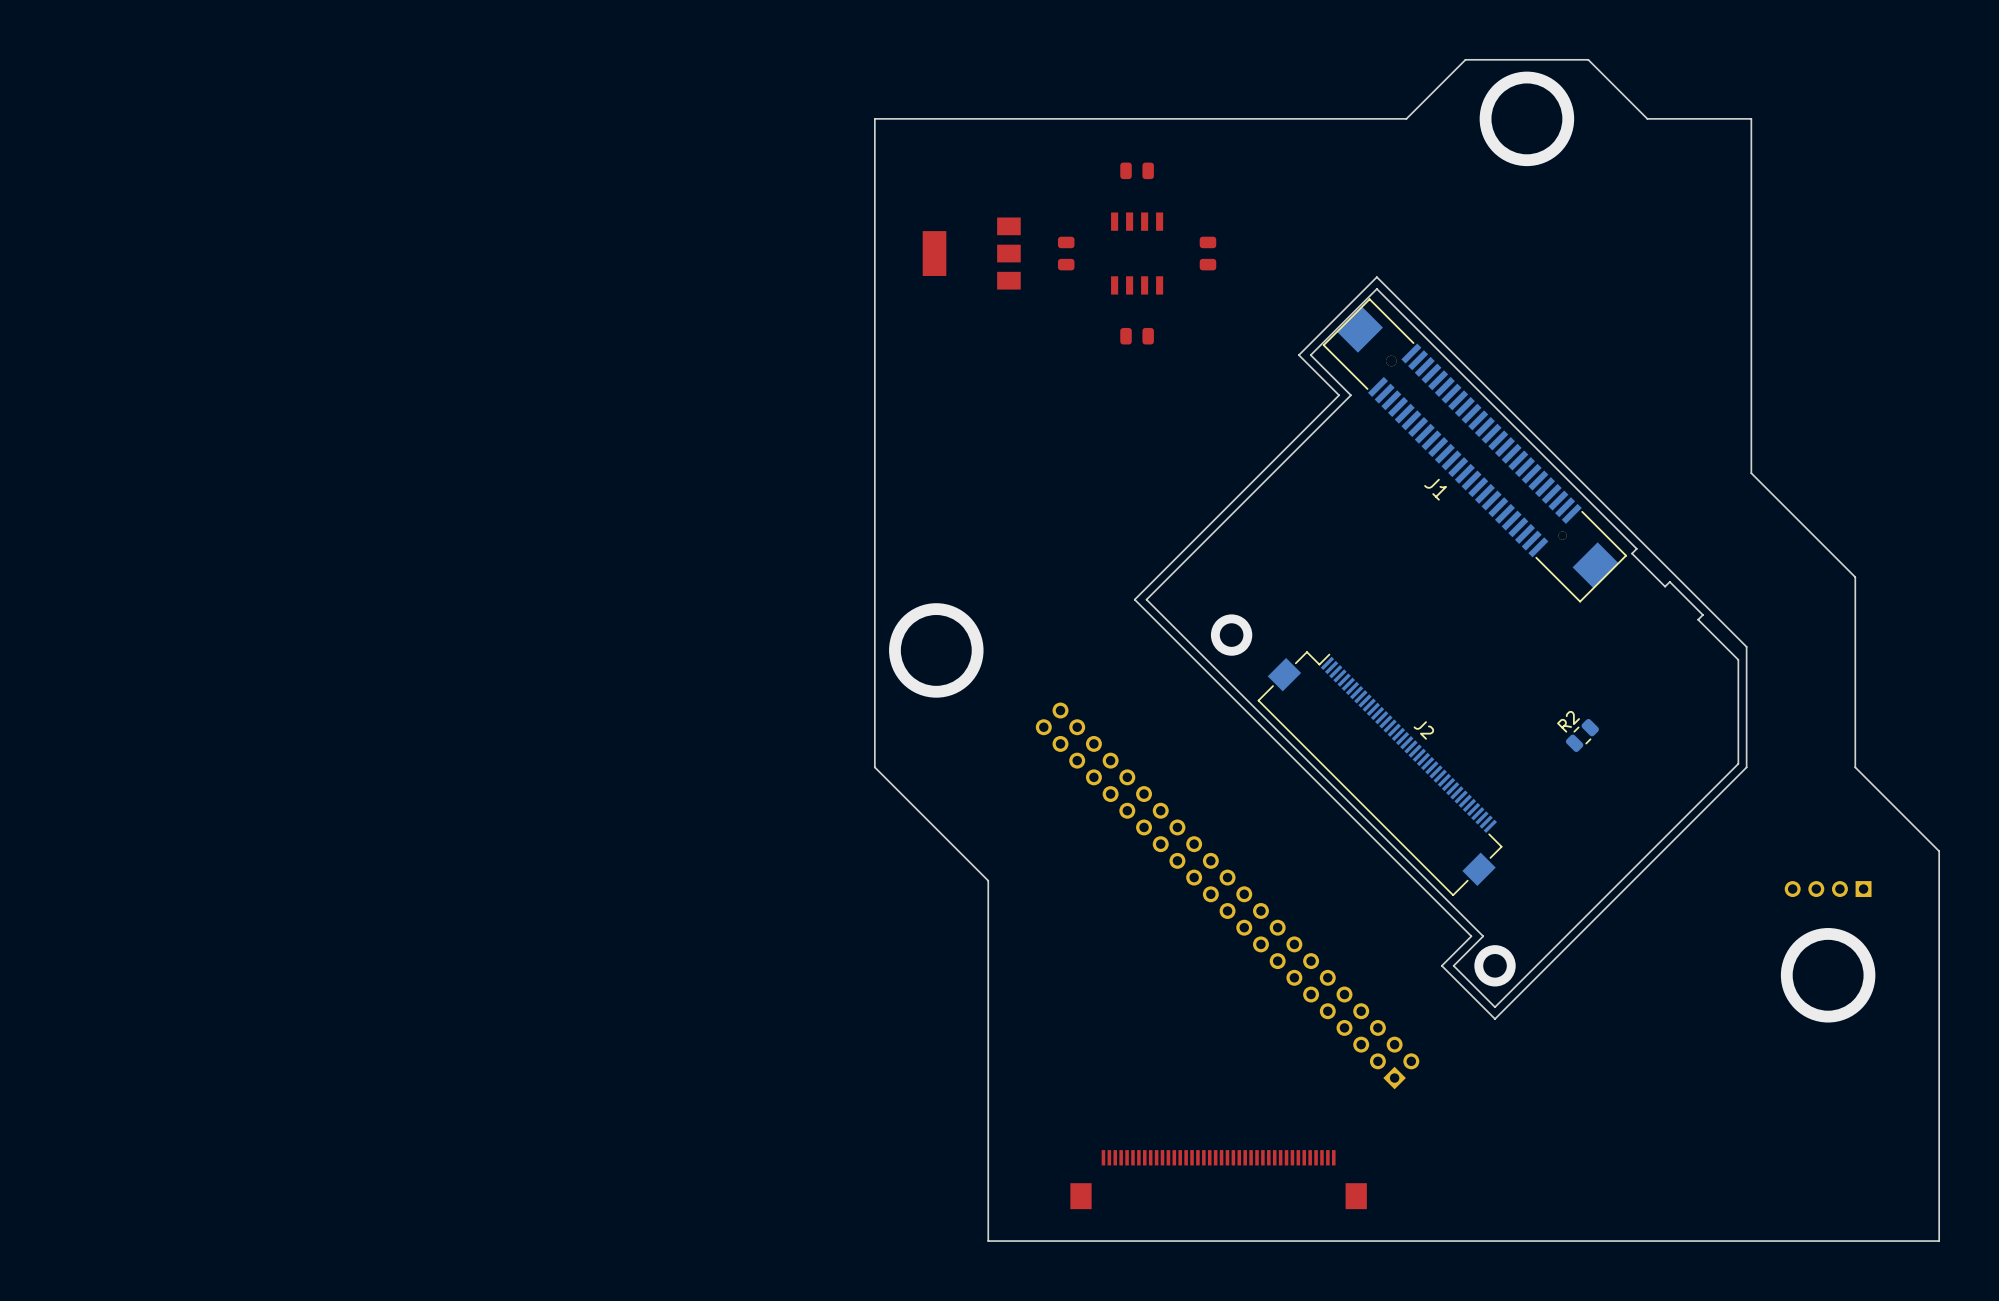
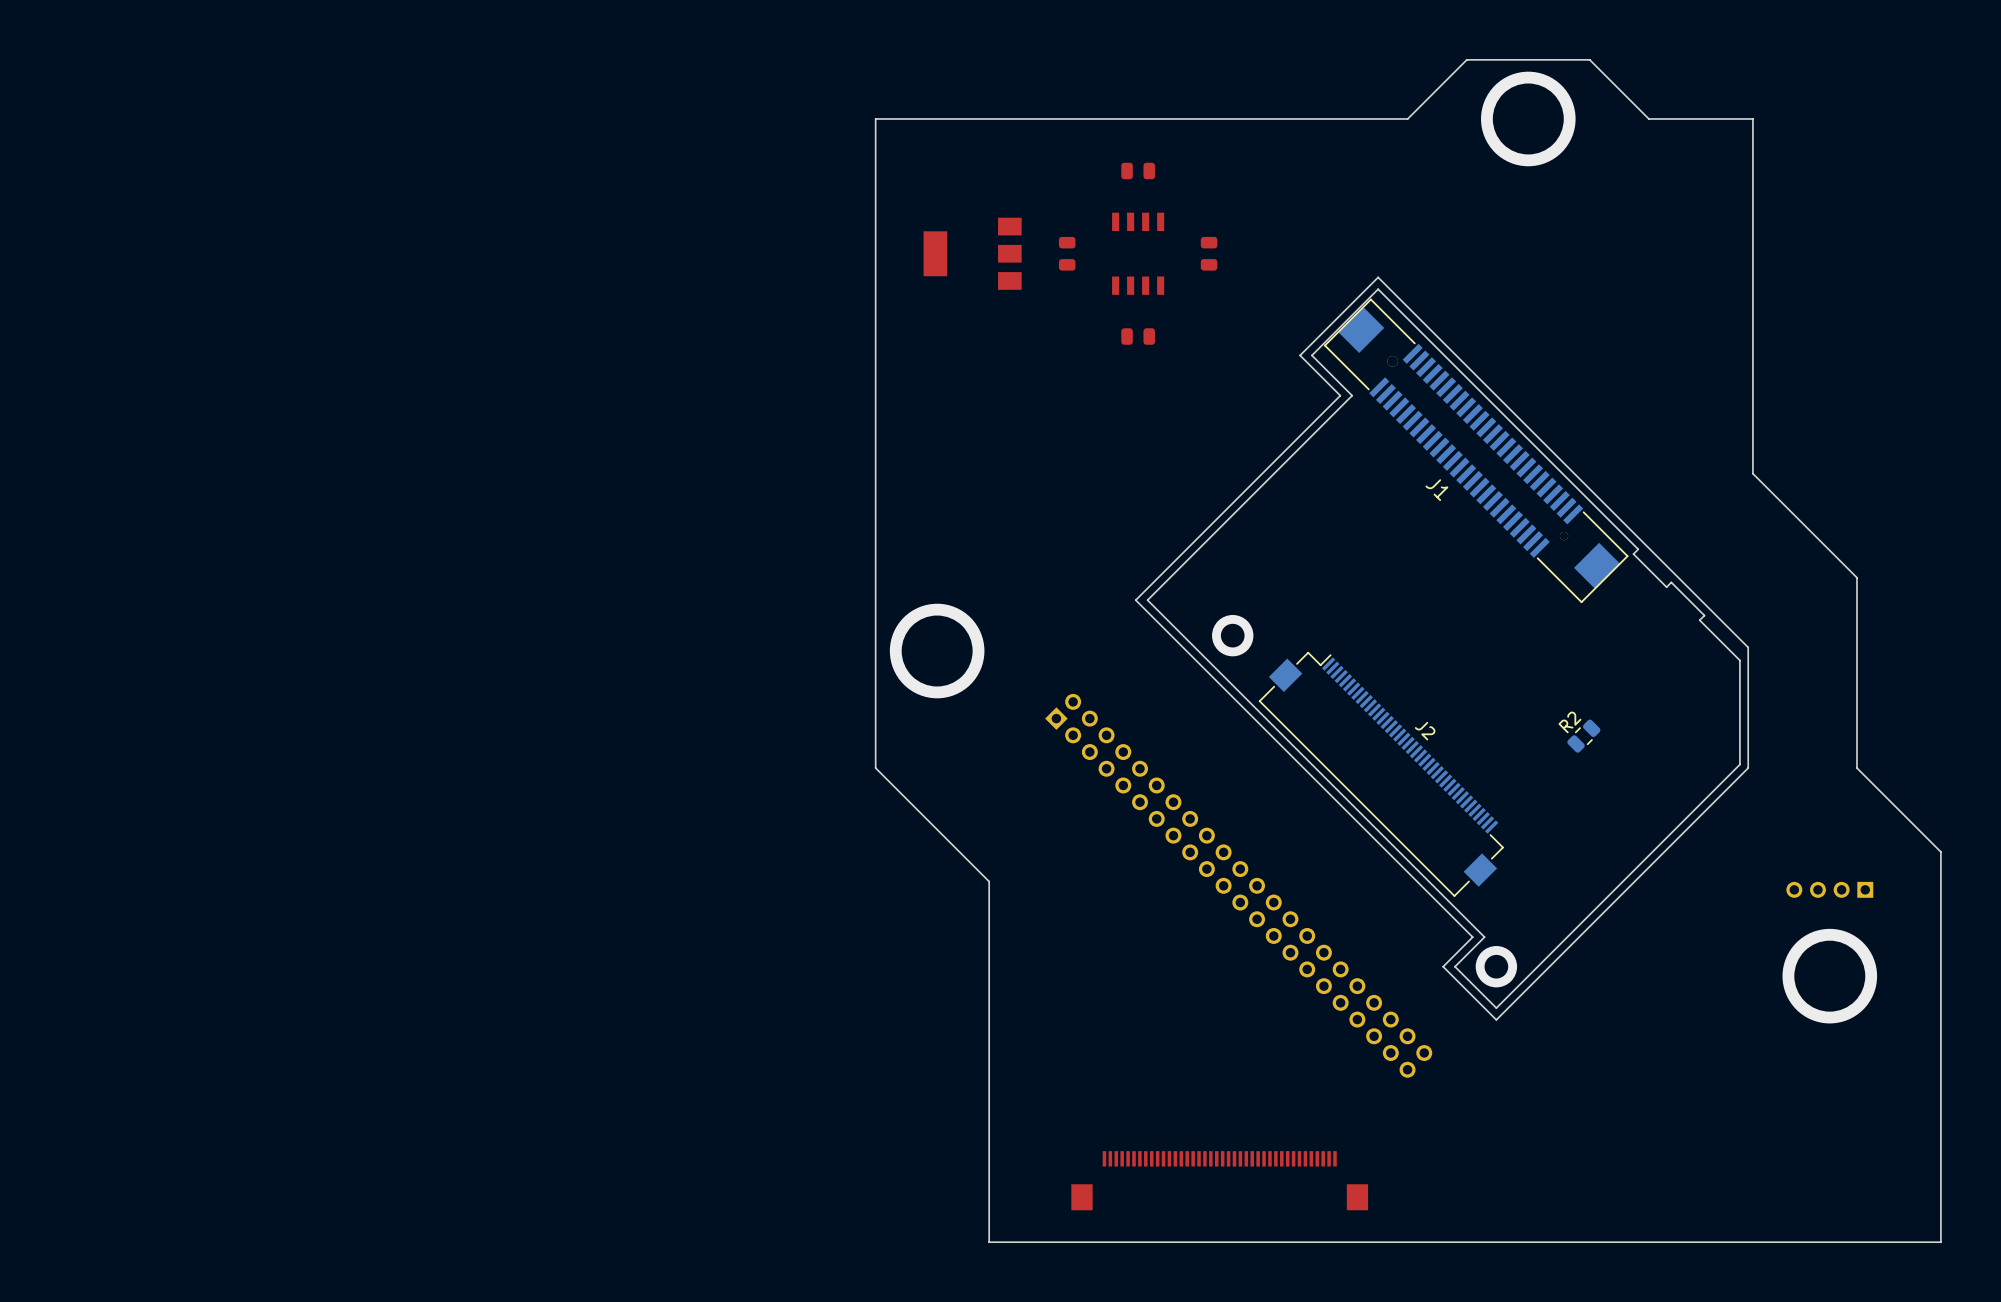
part: none -> (1238, 885)
part: (1227, 895) -> none

